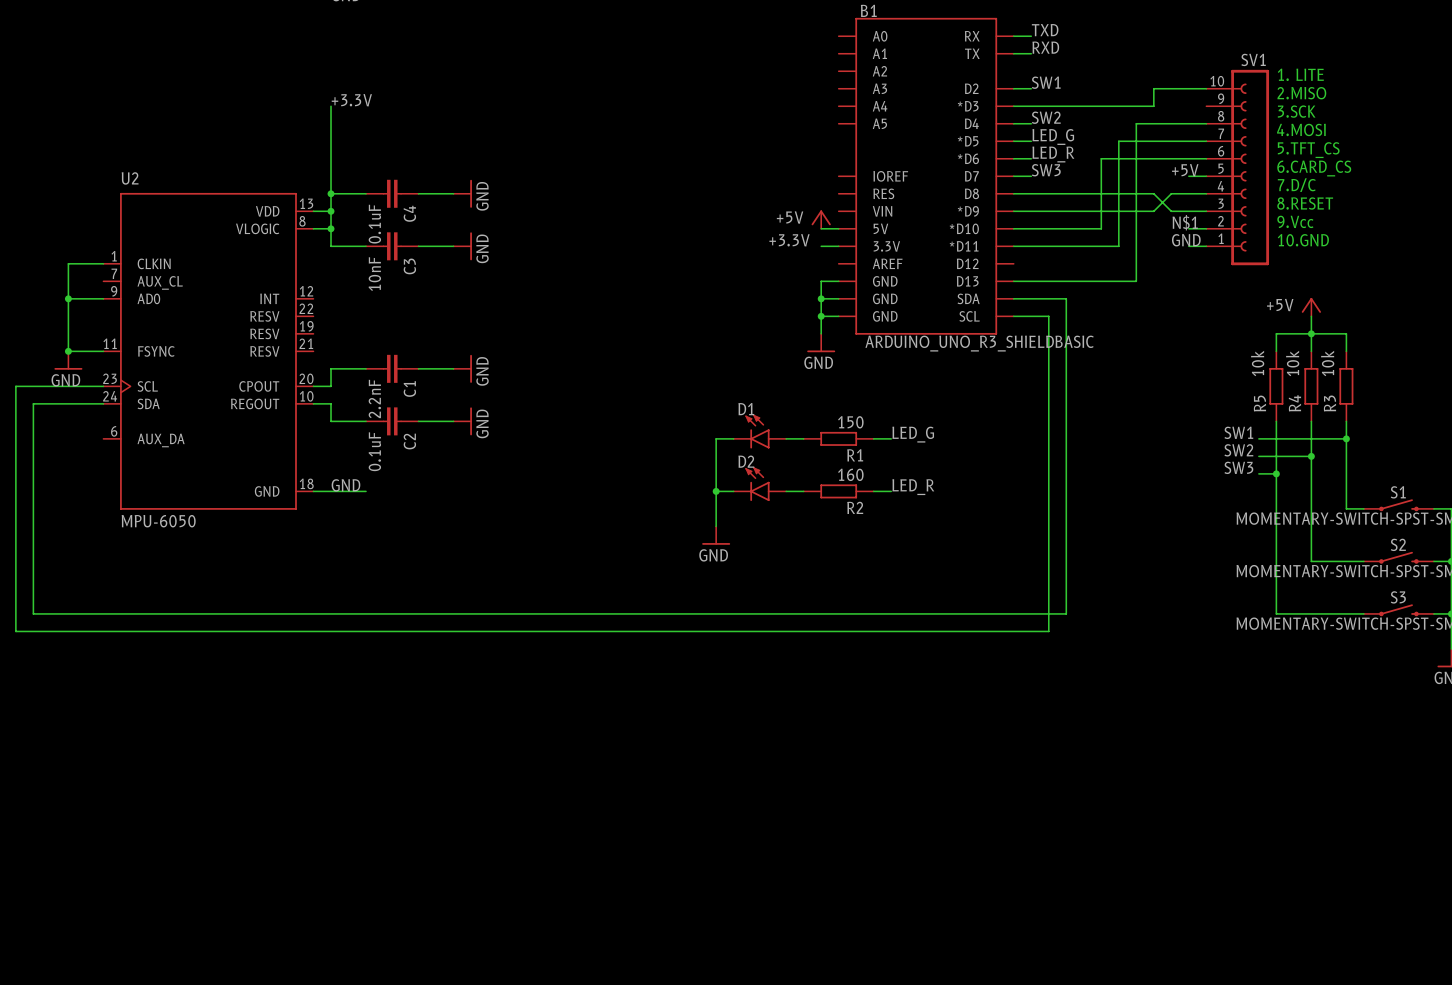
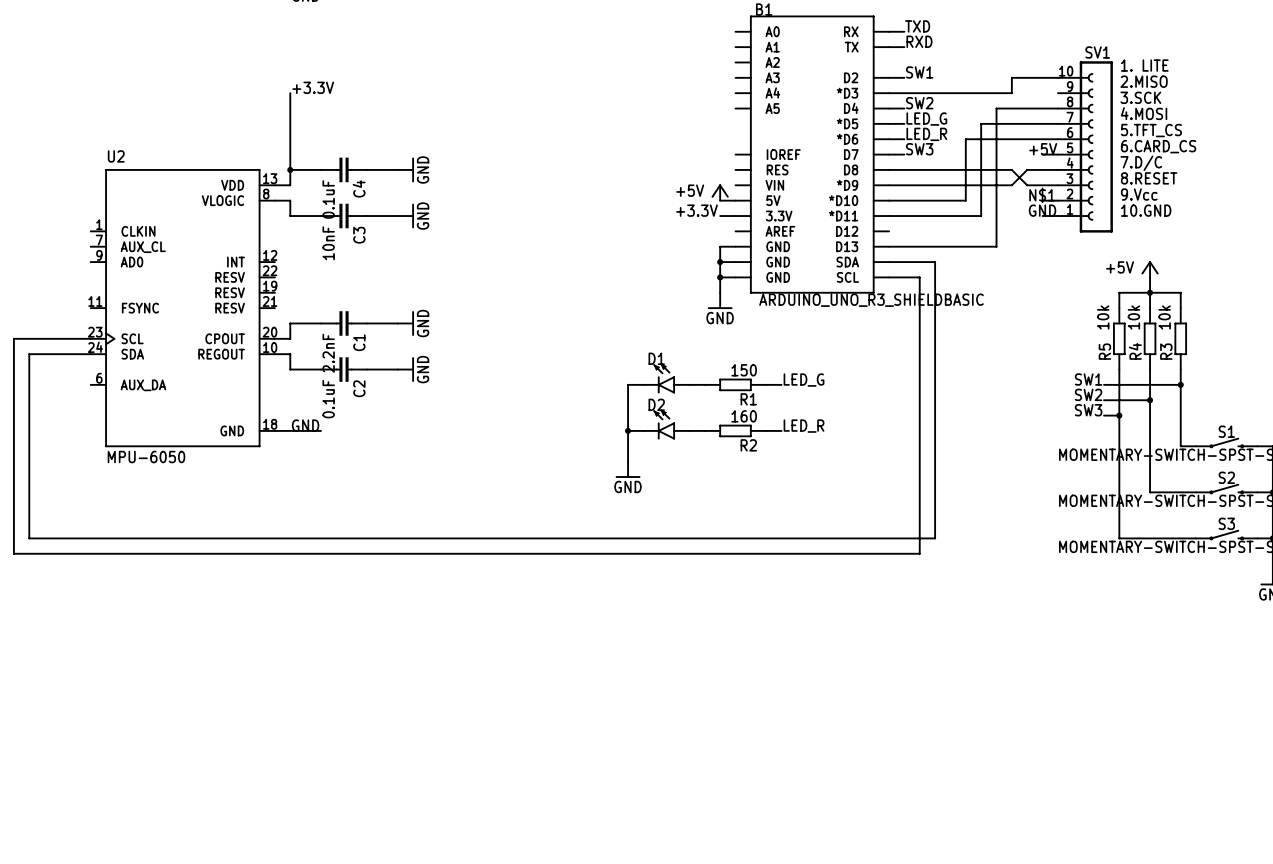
wire: (331, 211) (331, 228) -> none
junction: (331, 211) -> none
junction: (331, 228) -> none
wire: (103, 263) (68, 263) (68, 351) (103, 351) -> none
wire: (68, 298) (103, 298) -> none
junction: (68, 298) -> none
junction: (68, 351) -> none
power symbol: GND (68, 360) -> none

